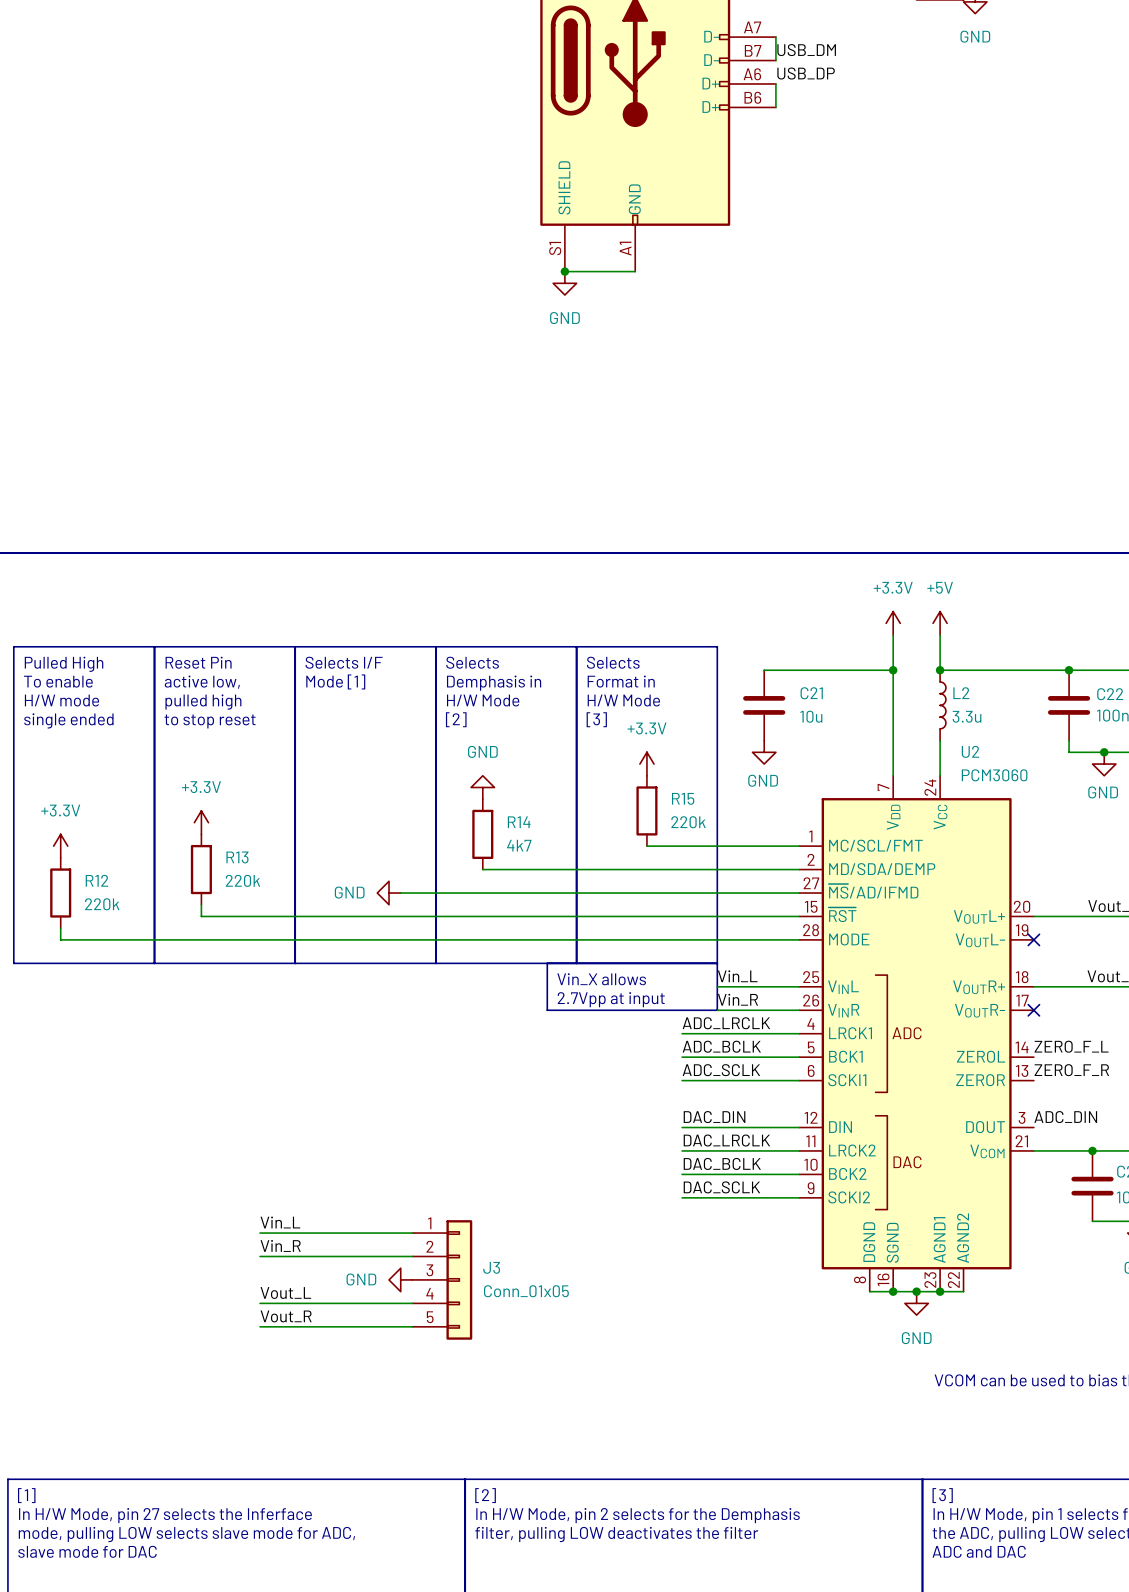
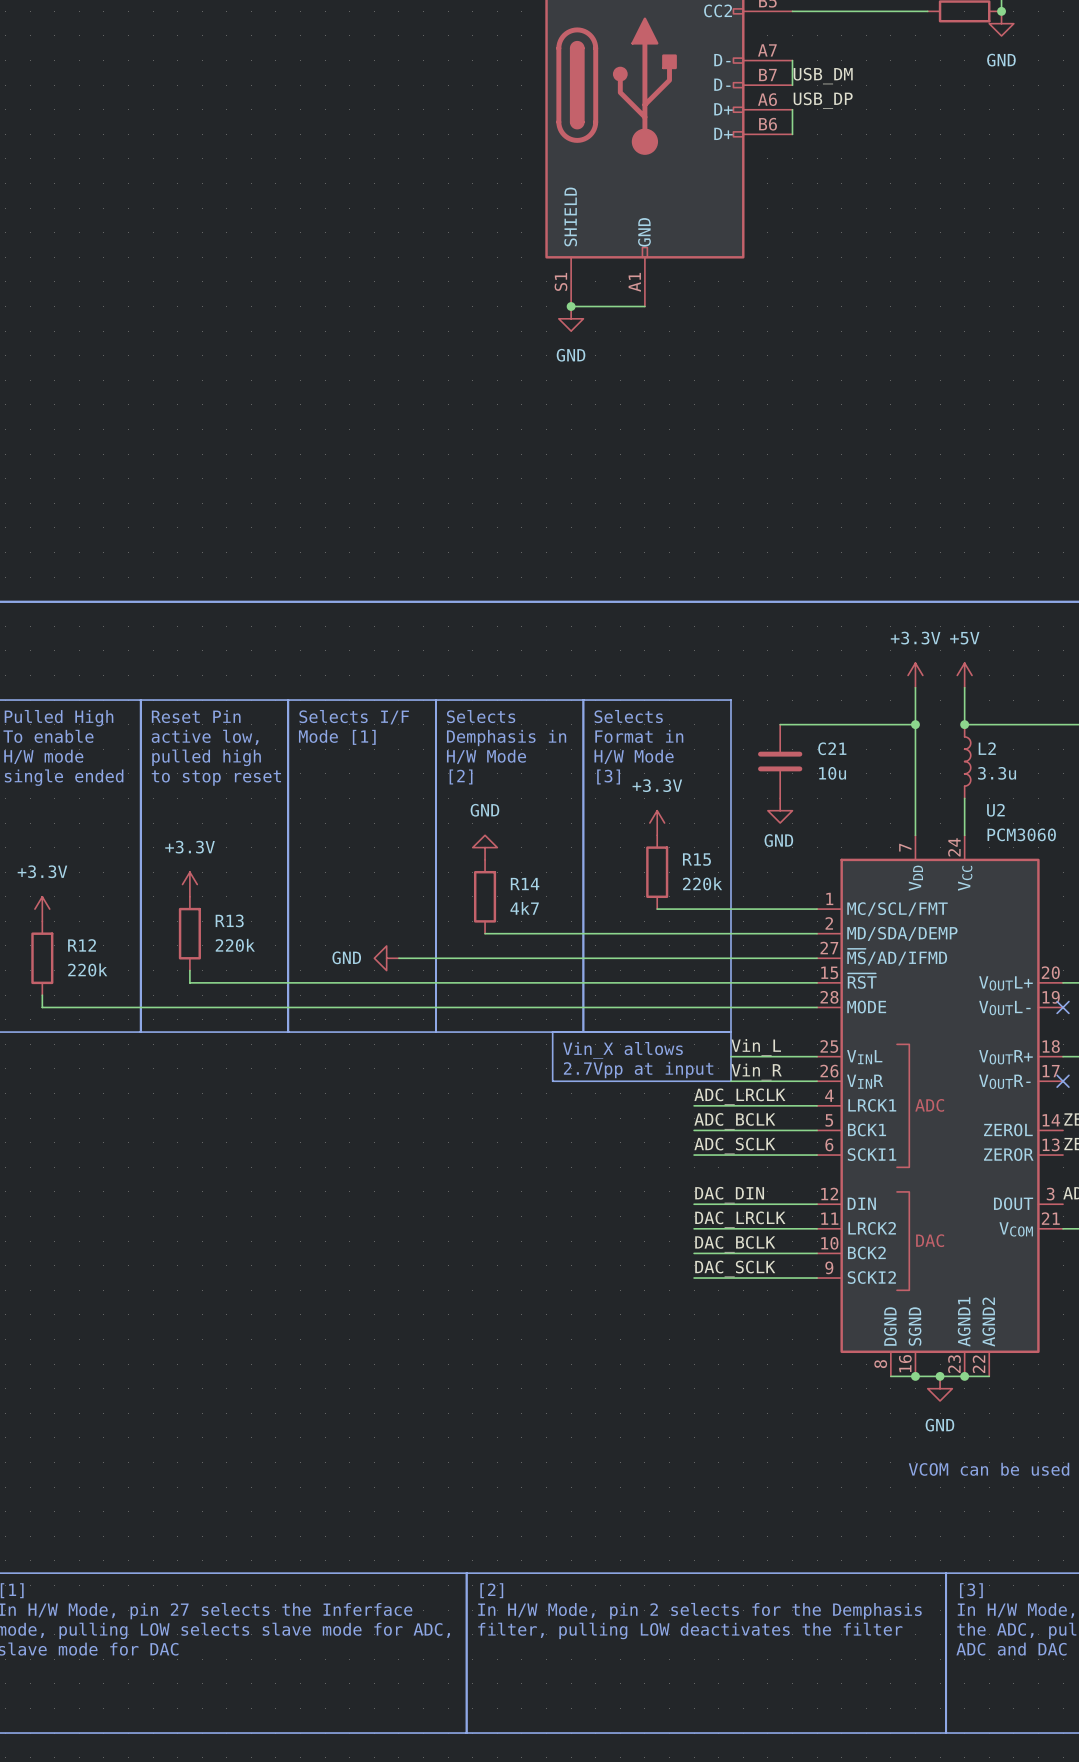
label: Vin_L (280, 1222) -> none
wire: (260, 1233) (412, 1233) -> none
label: Vin_R (280, 1245) -> none
wire: (260, 1256) (412, 1256) -> none
power symbol: GND (400, 1279) -> none
J3: Conn_01x05 (442, 1279) -> none
label: Vout_L (285, 1292) -> none
wire: (260, 1303) (412, 1303) -> none
label: Vout_R (286, 1316) -> none
wire: (260, 1326) (412, 1326) -> none

